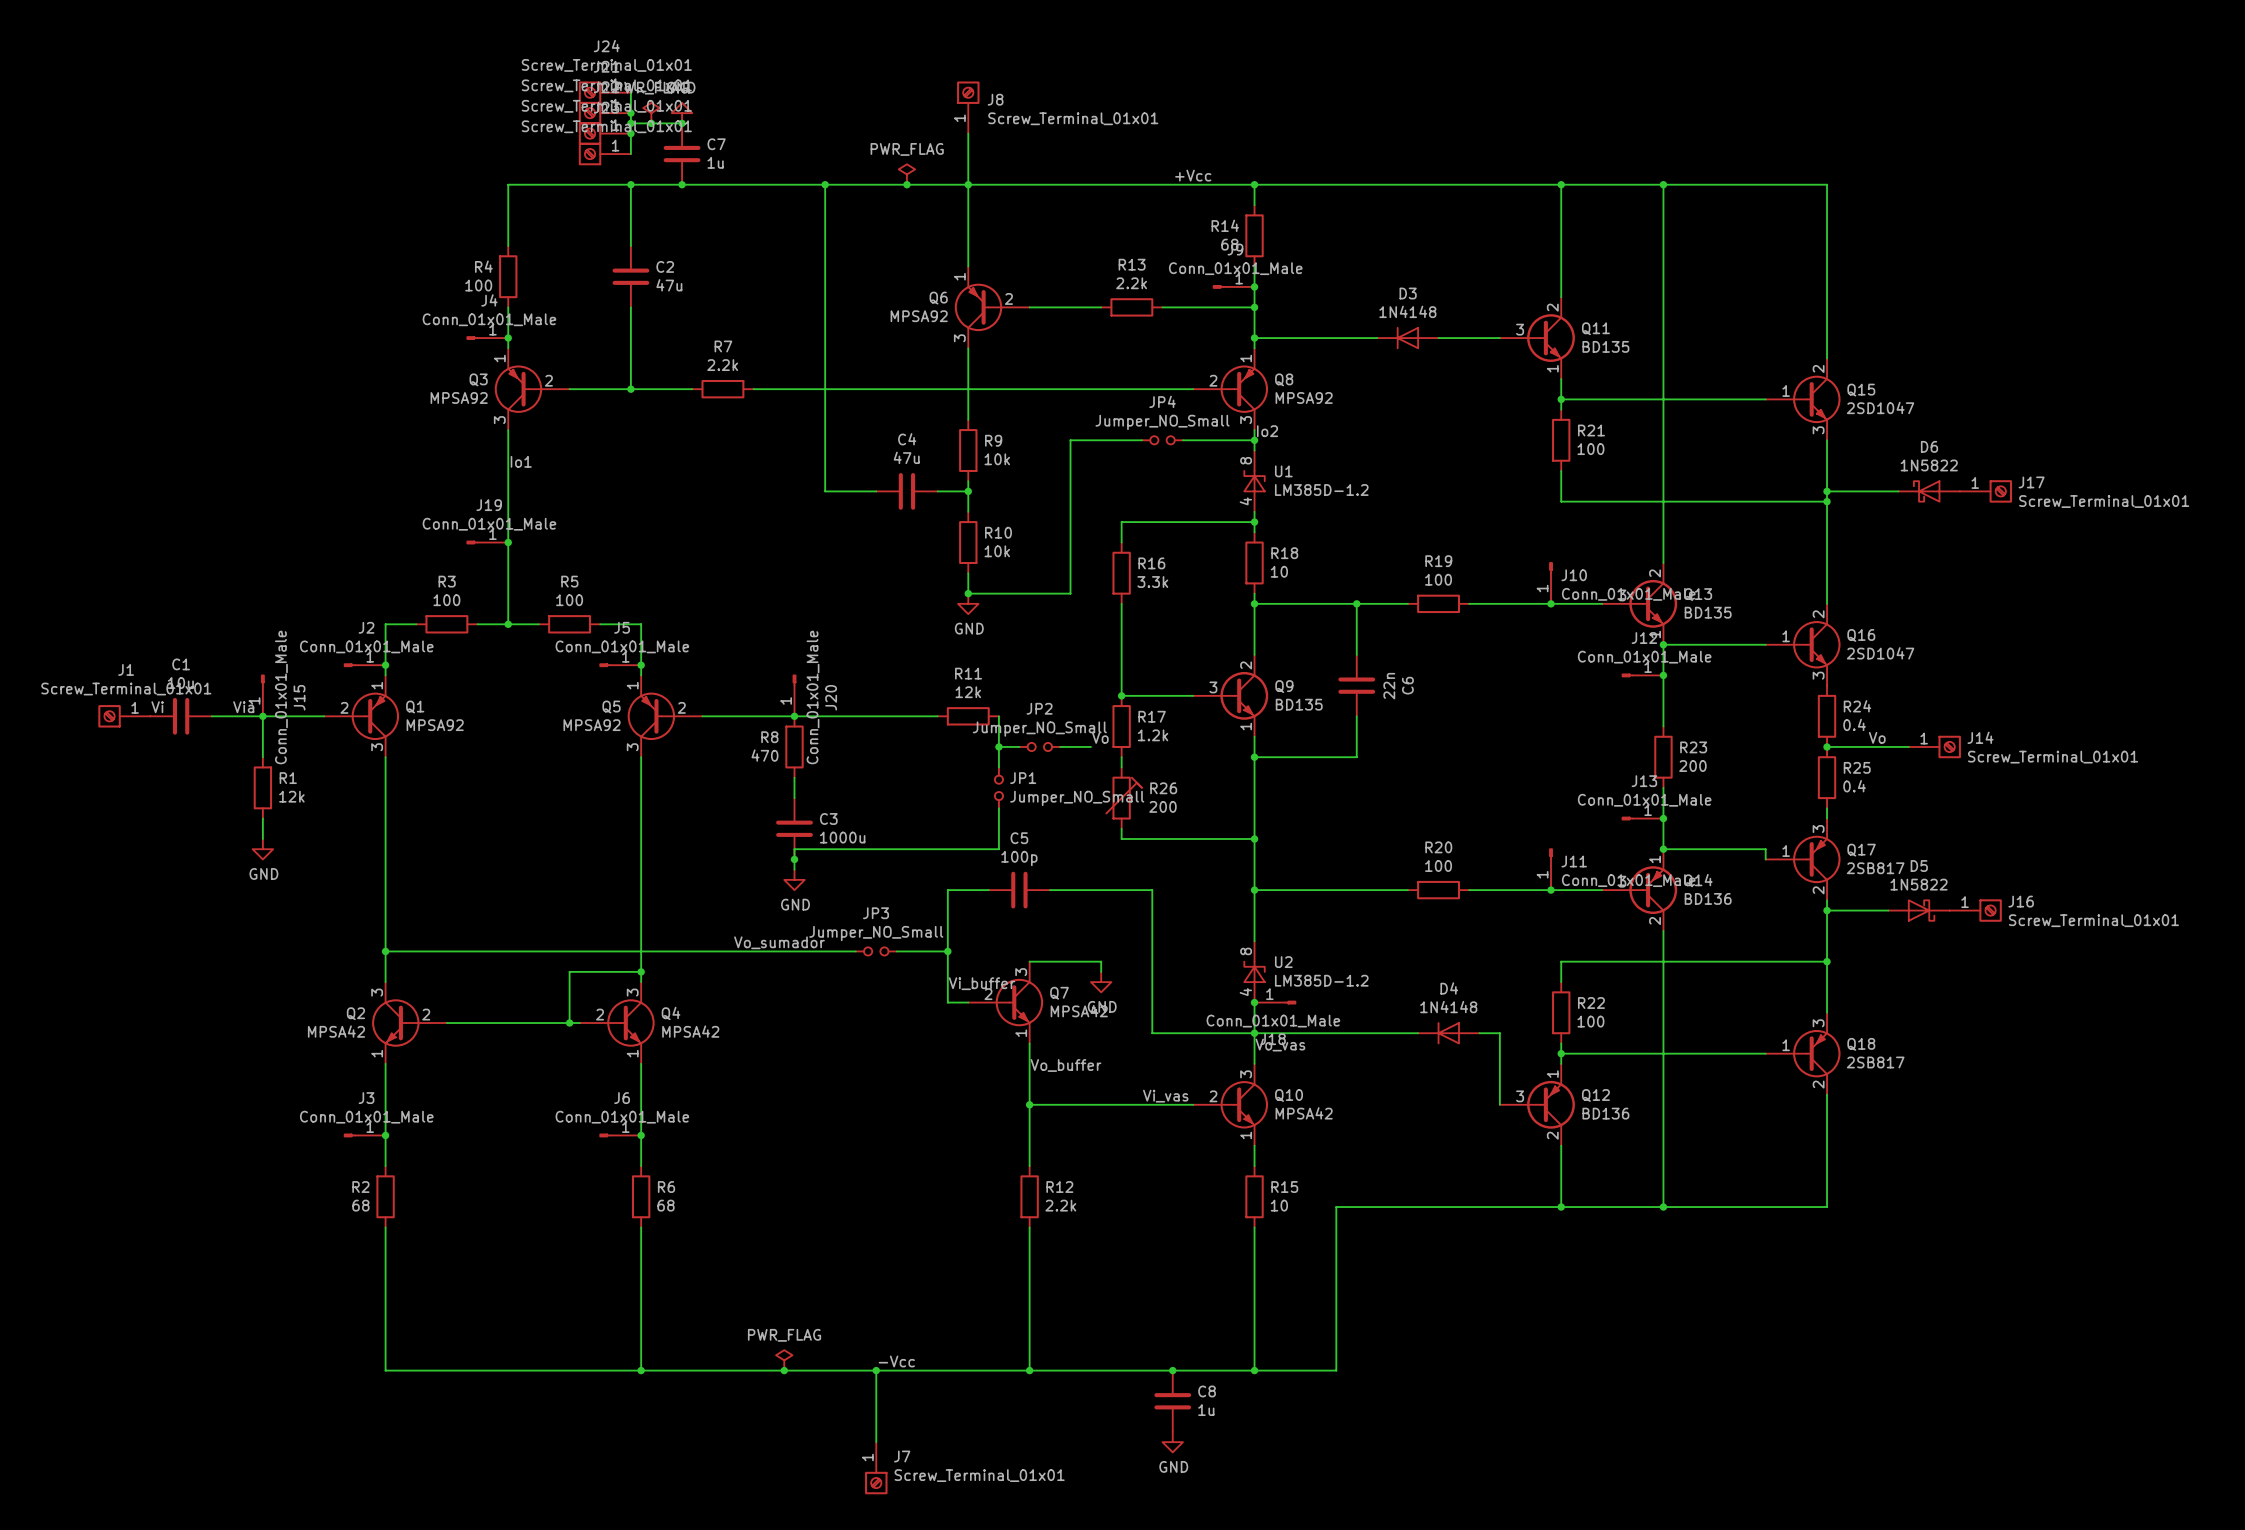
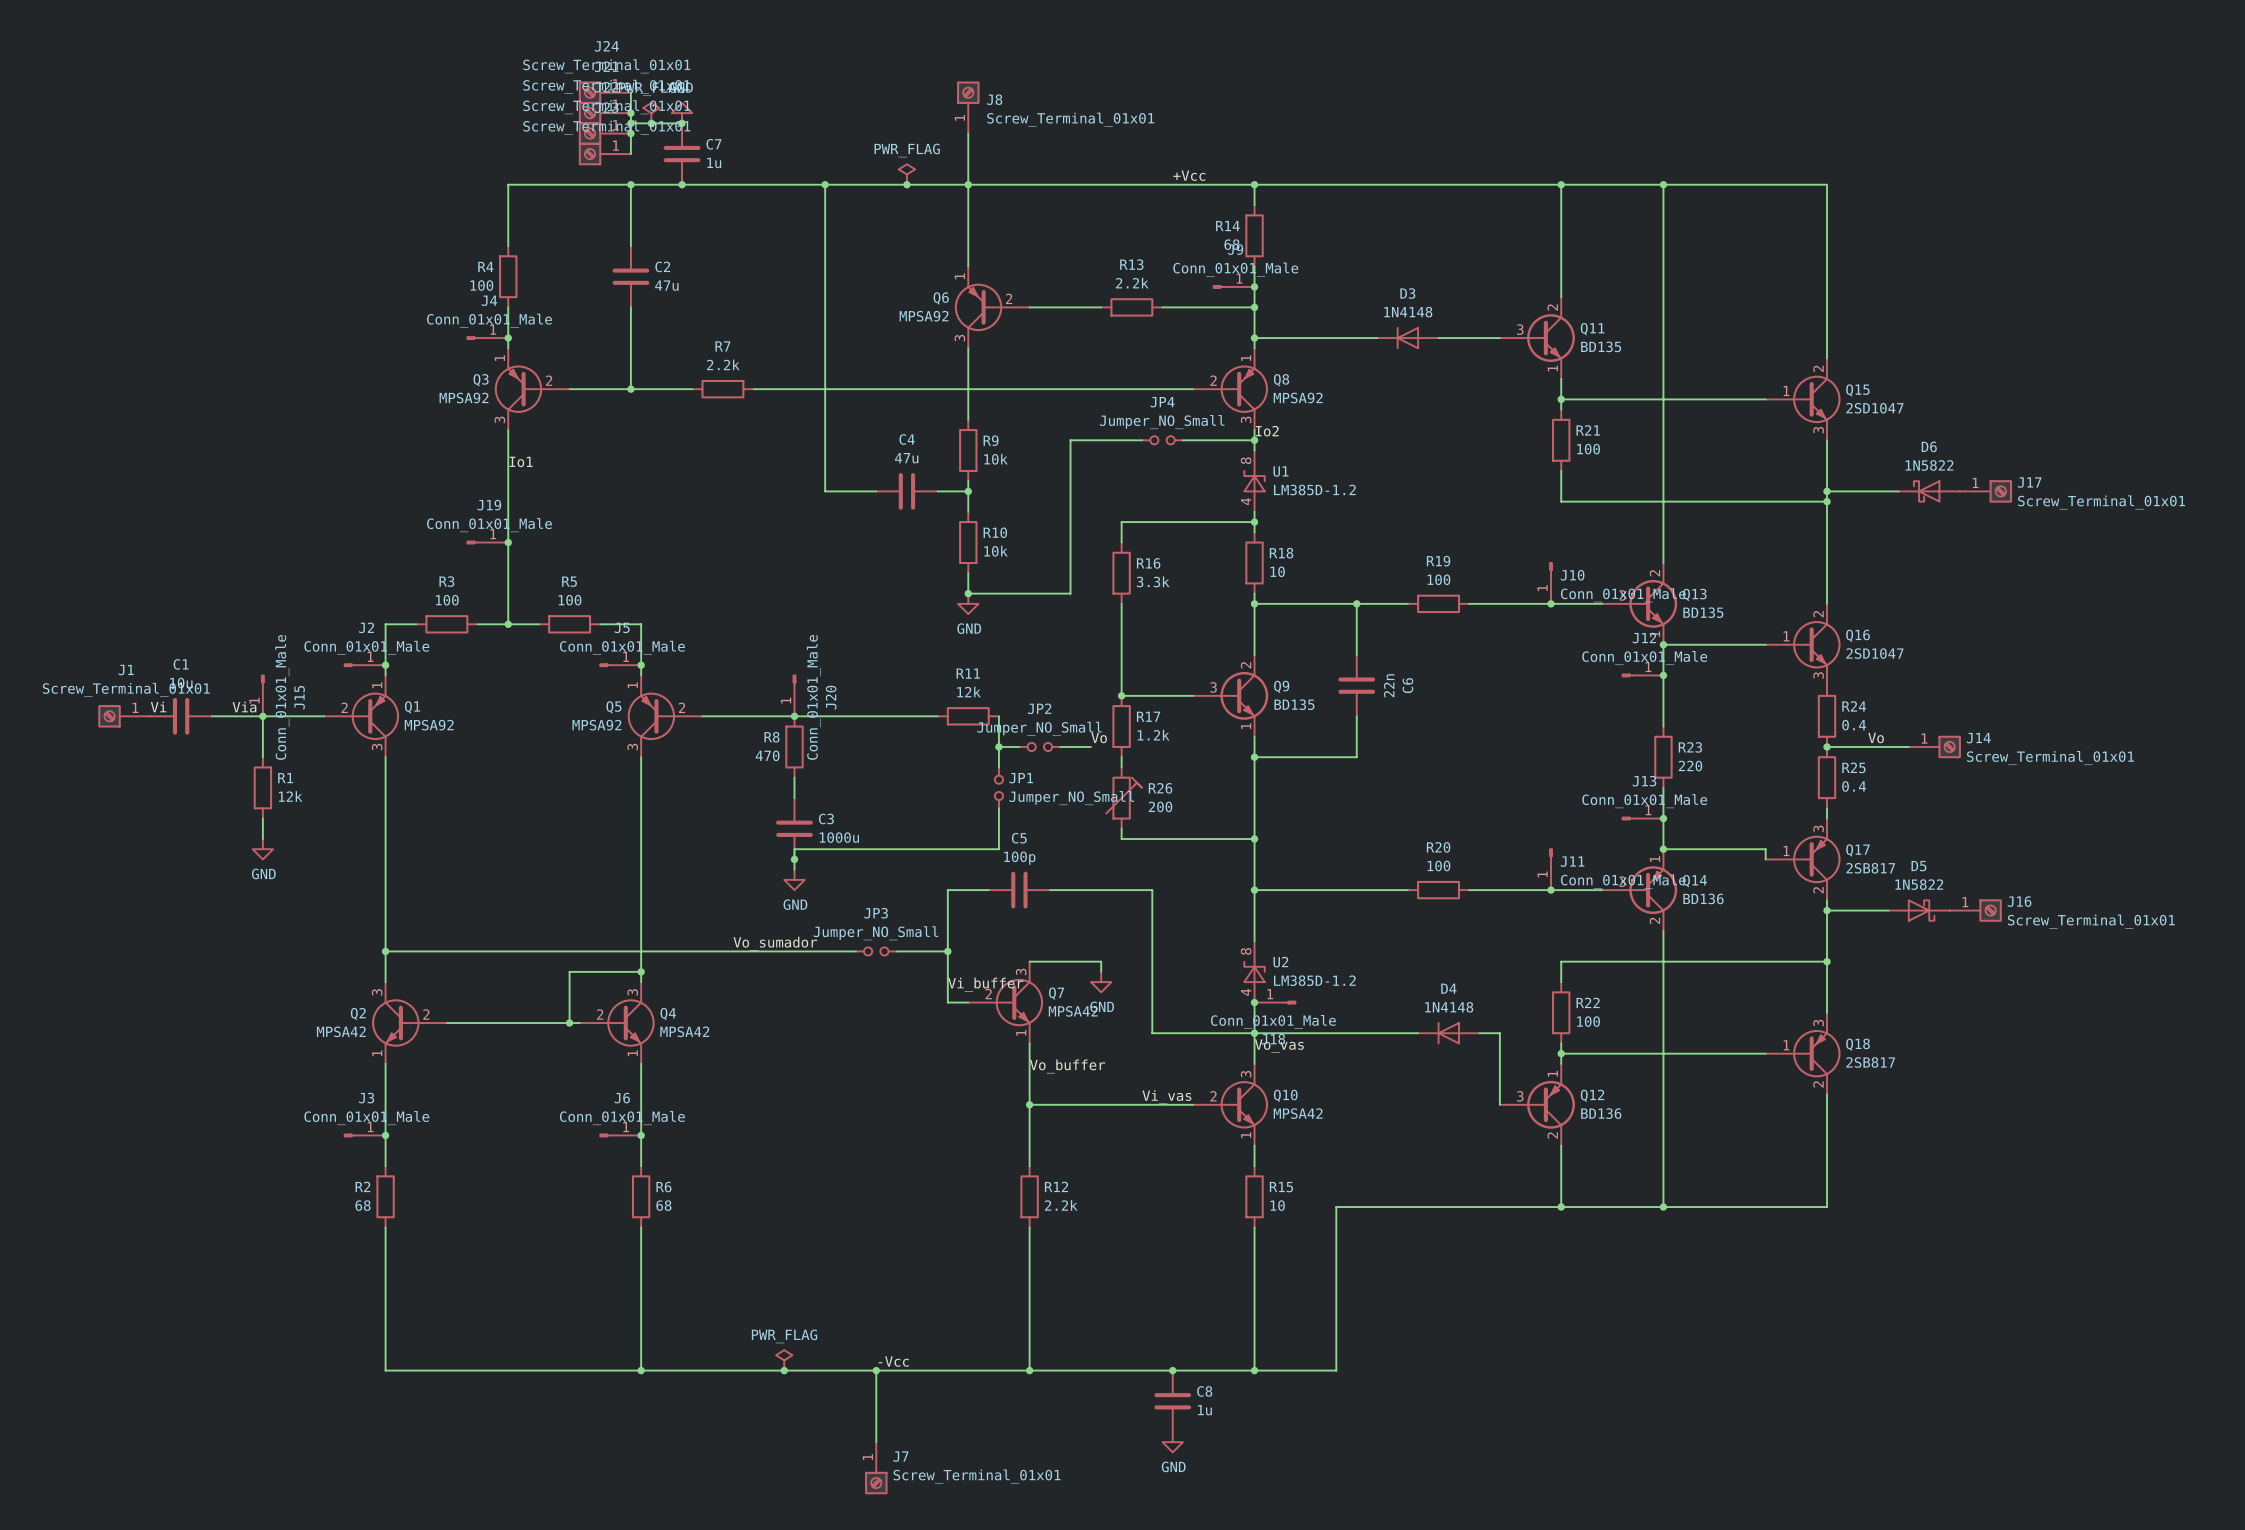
R23 value: 200 (1692, 766) -> 220 (1690, 766)

